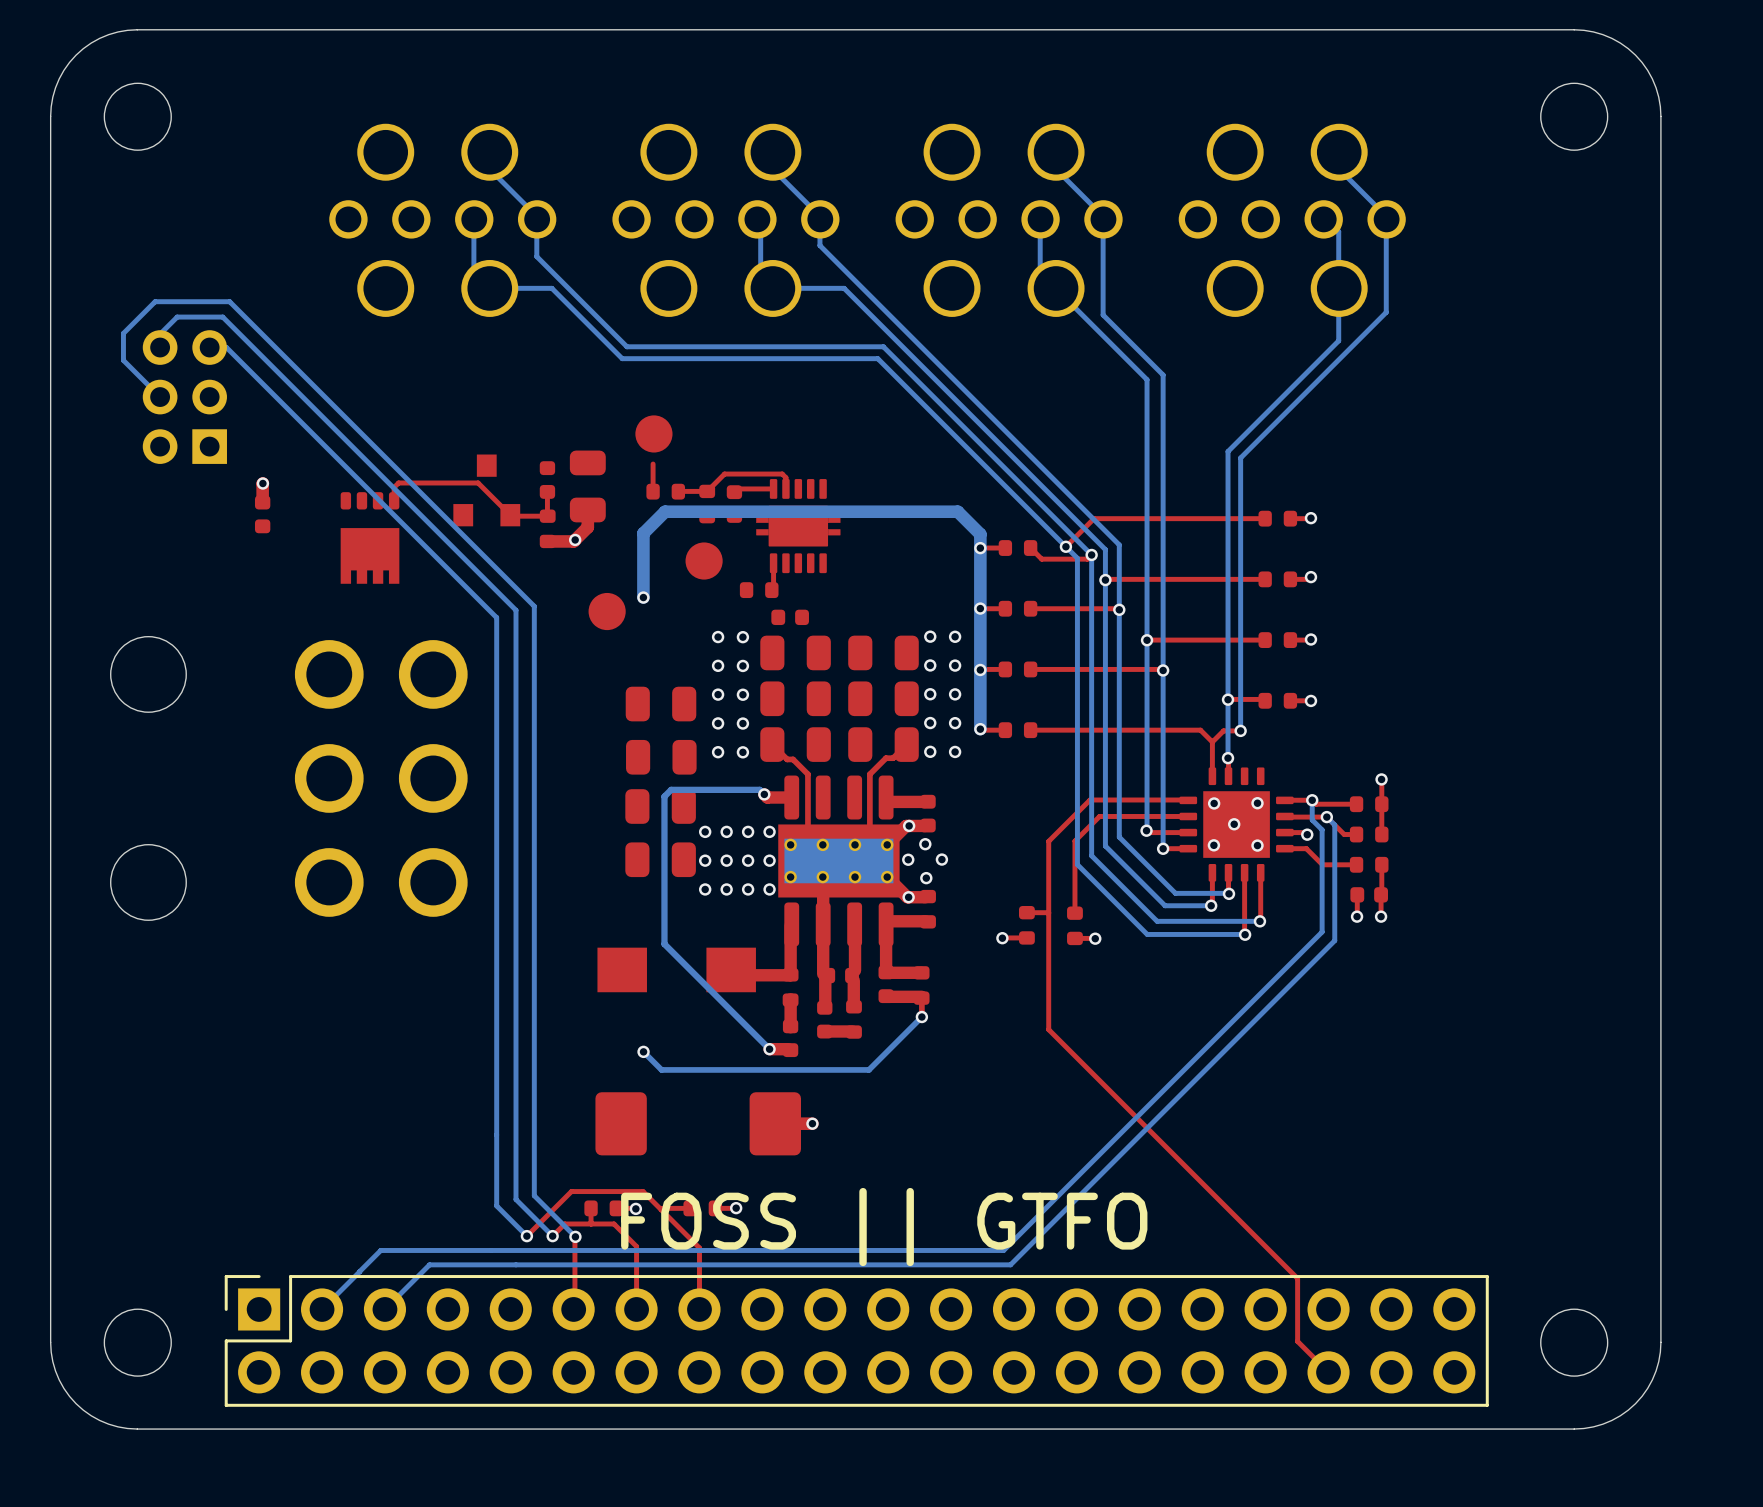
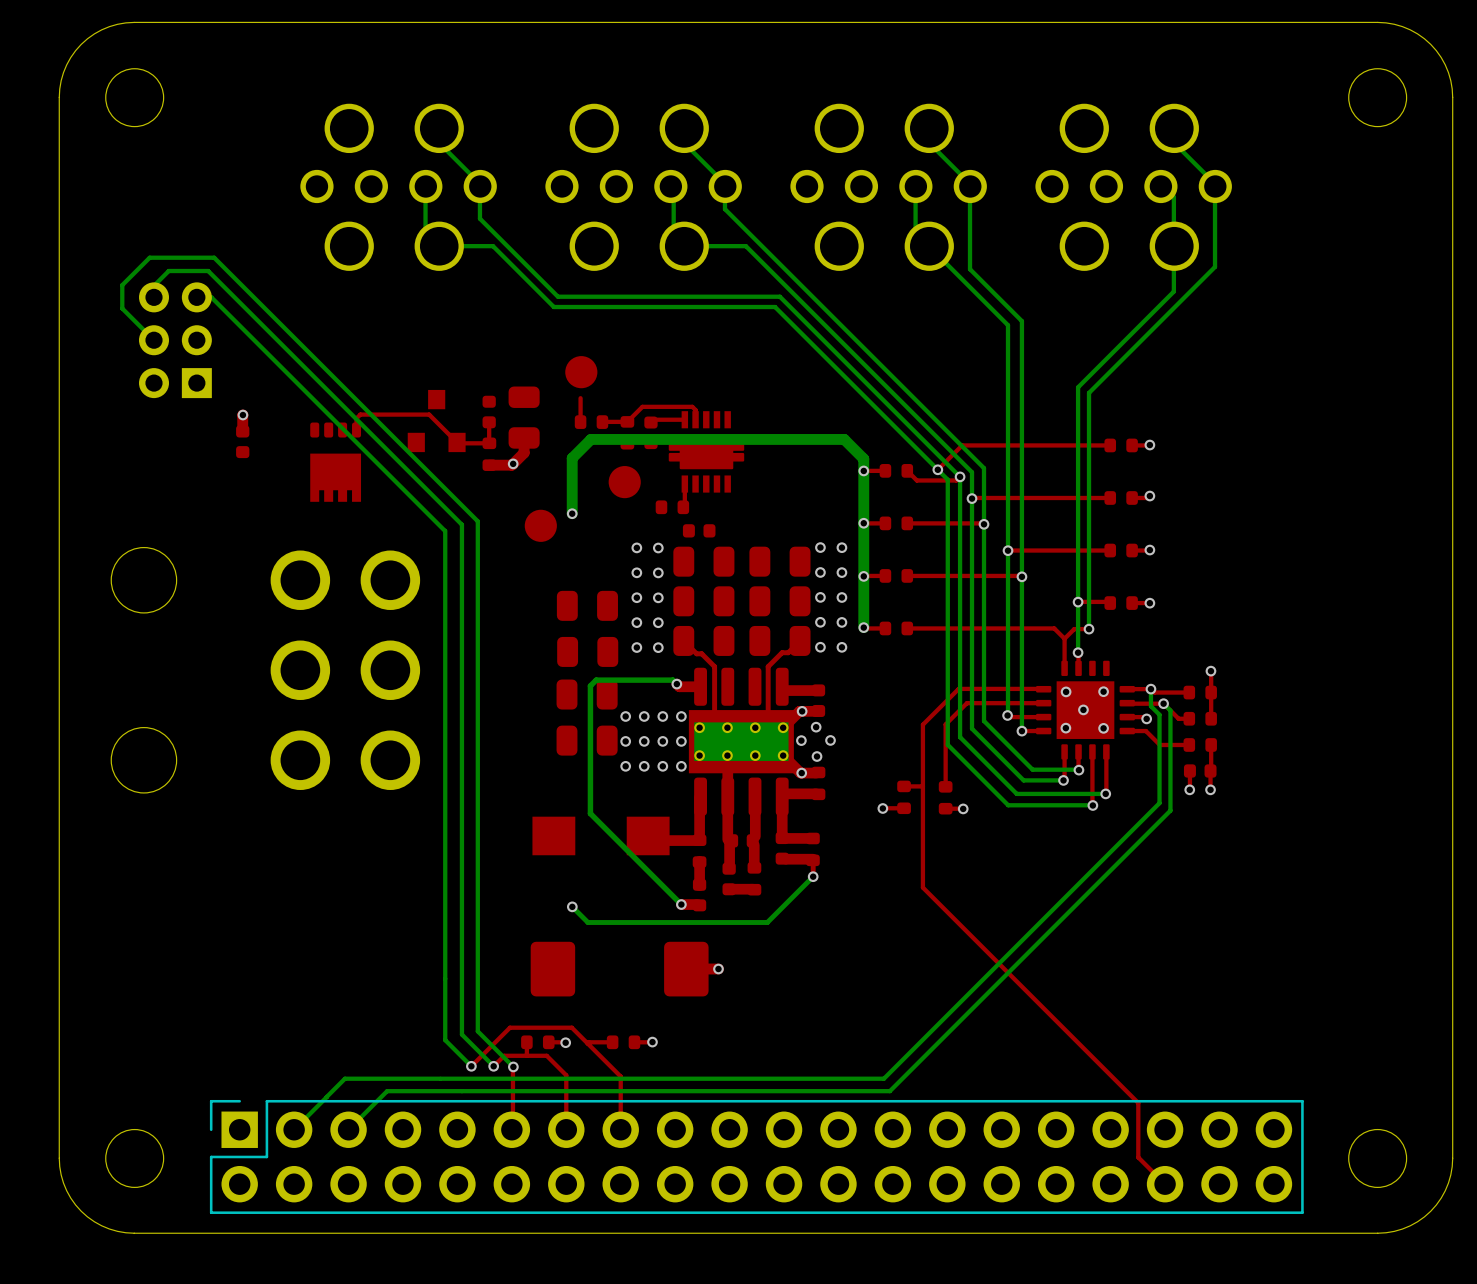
part footprint: [756, 479, 841, 574] -> [668, 411, 745, 493]
text: FOSS || GTFO (884, 1227) -> none

